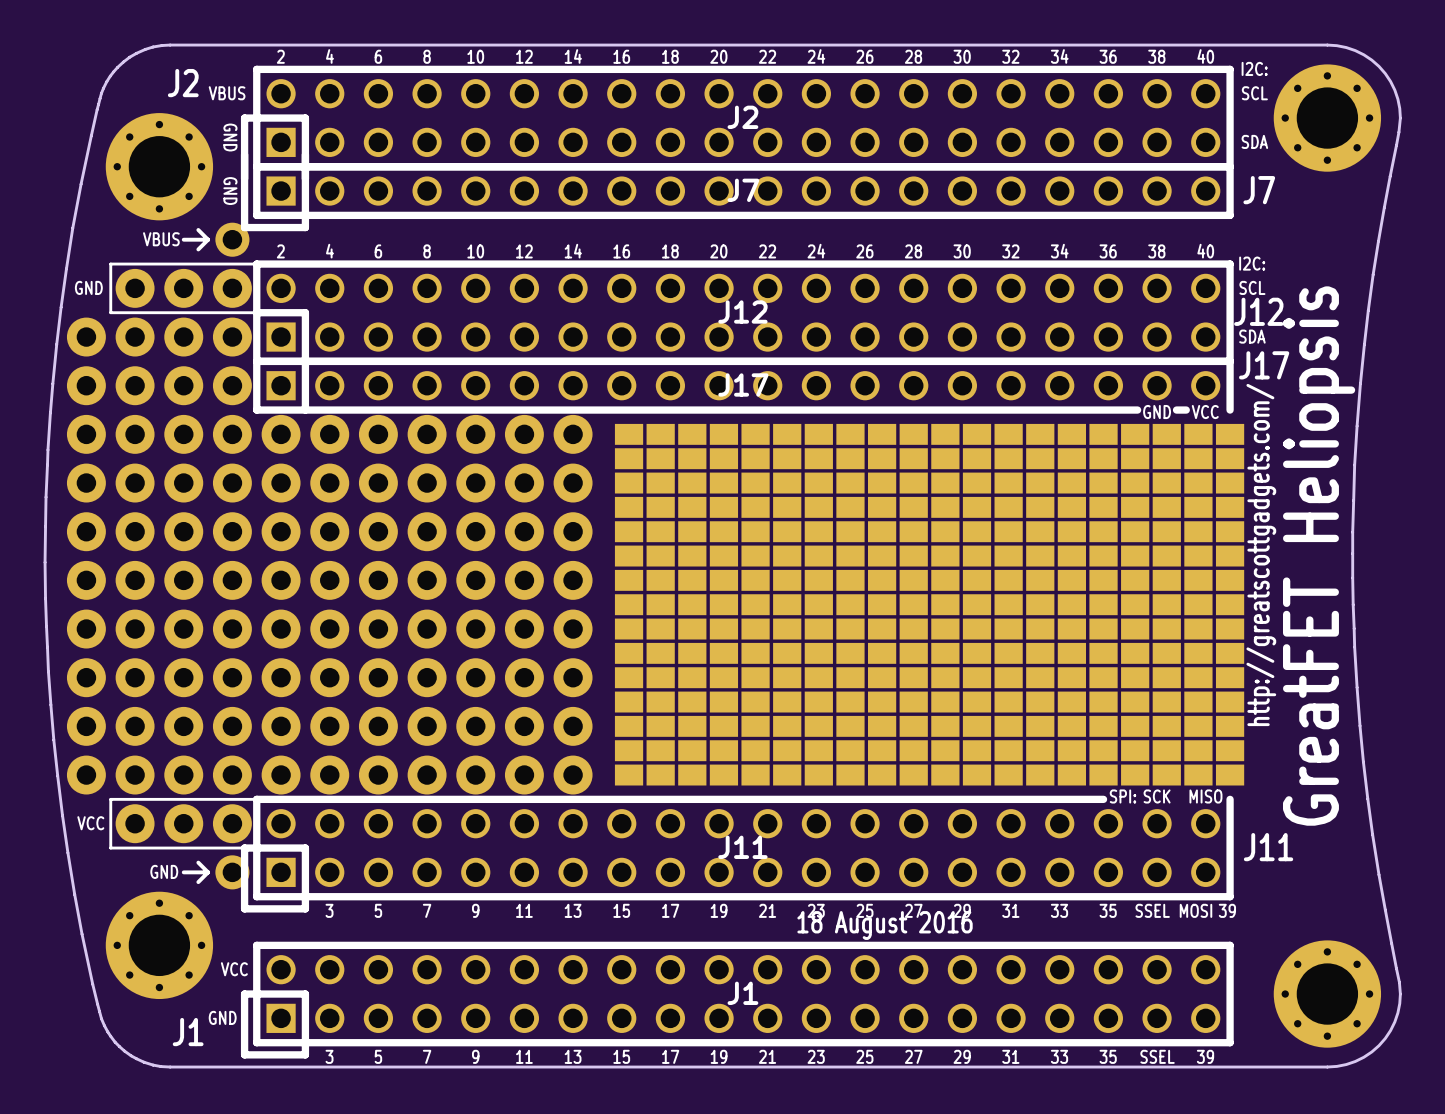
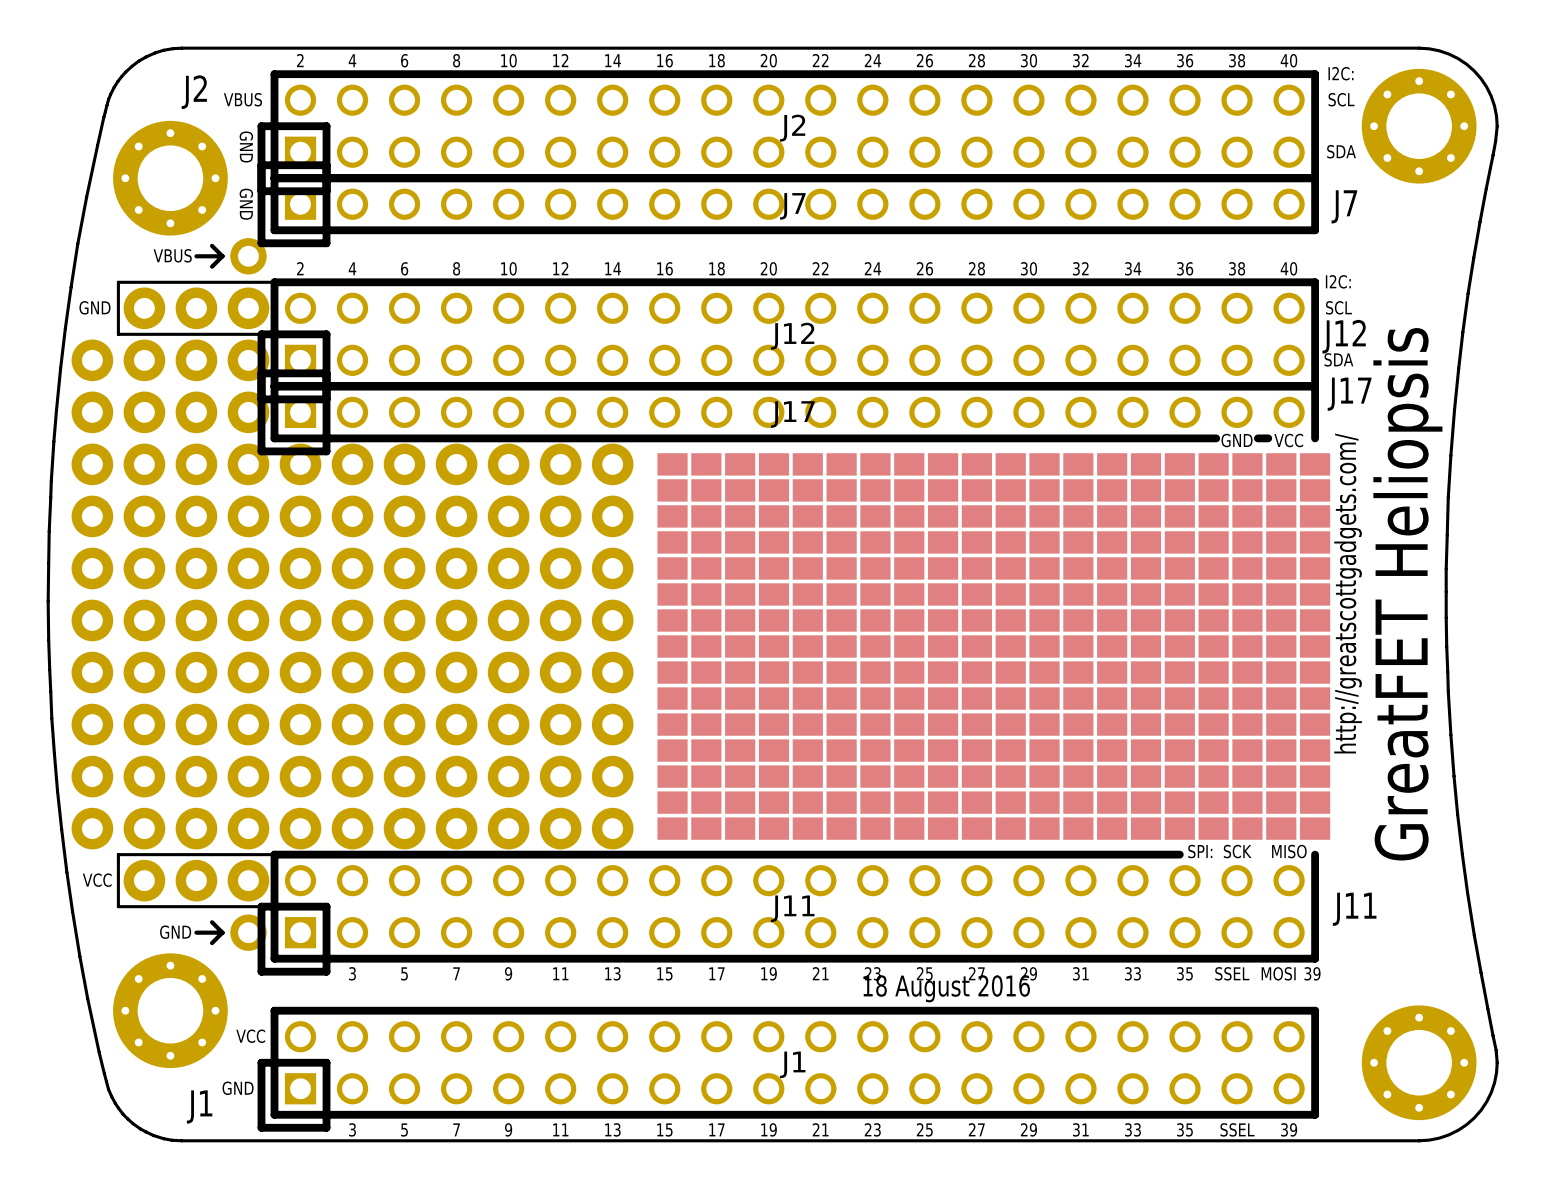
J2 footprint: [240, 65, 1234, 183] -> [257, 70, 1319, 196]
J7 footprint: [240, 150, 1234, 232] -> [257, 161, 1319, 248]
J12 footprint: [253, 260, 1234, 366] -> [257, 278, 1319, 404]
J17 footprint: [253, 357, 1234, 414] -> [257, 369, 1319, 456]

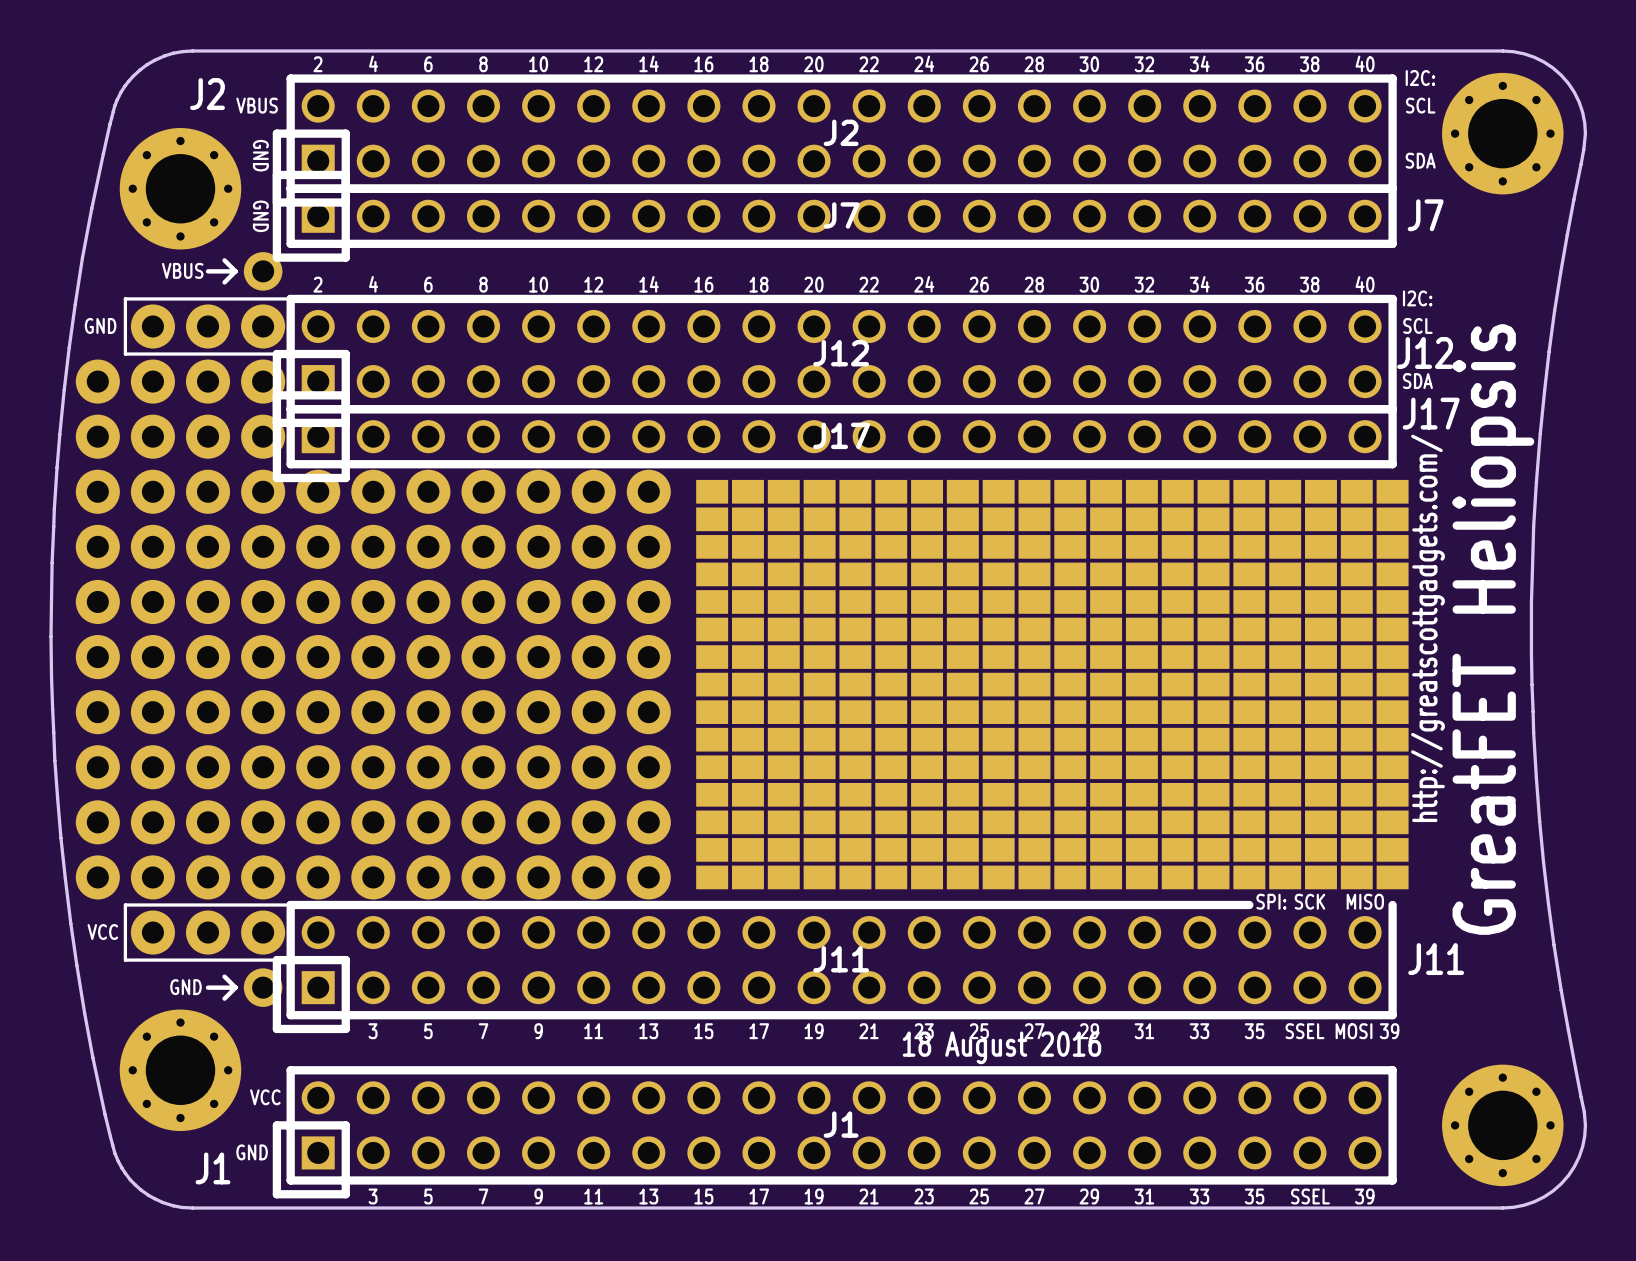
J17 footprint: [257, 369, 1319, 456] -> [272, 391, 1397, 483]
line: (1257, 438) (1268, 438) -> none
text: GND (1237, 440) -> none
text: VCC (1288, 440) -> none

